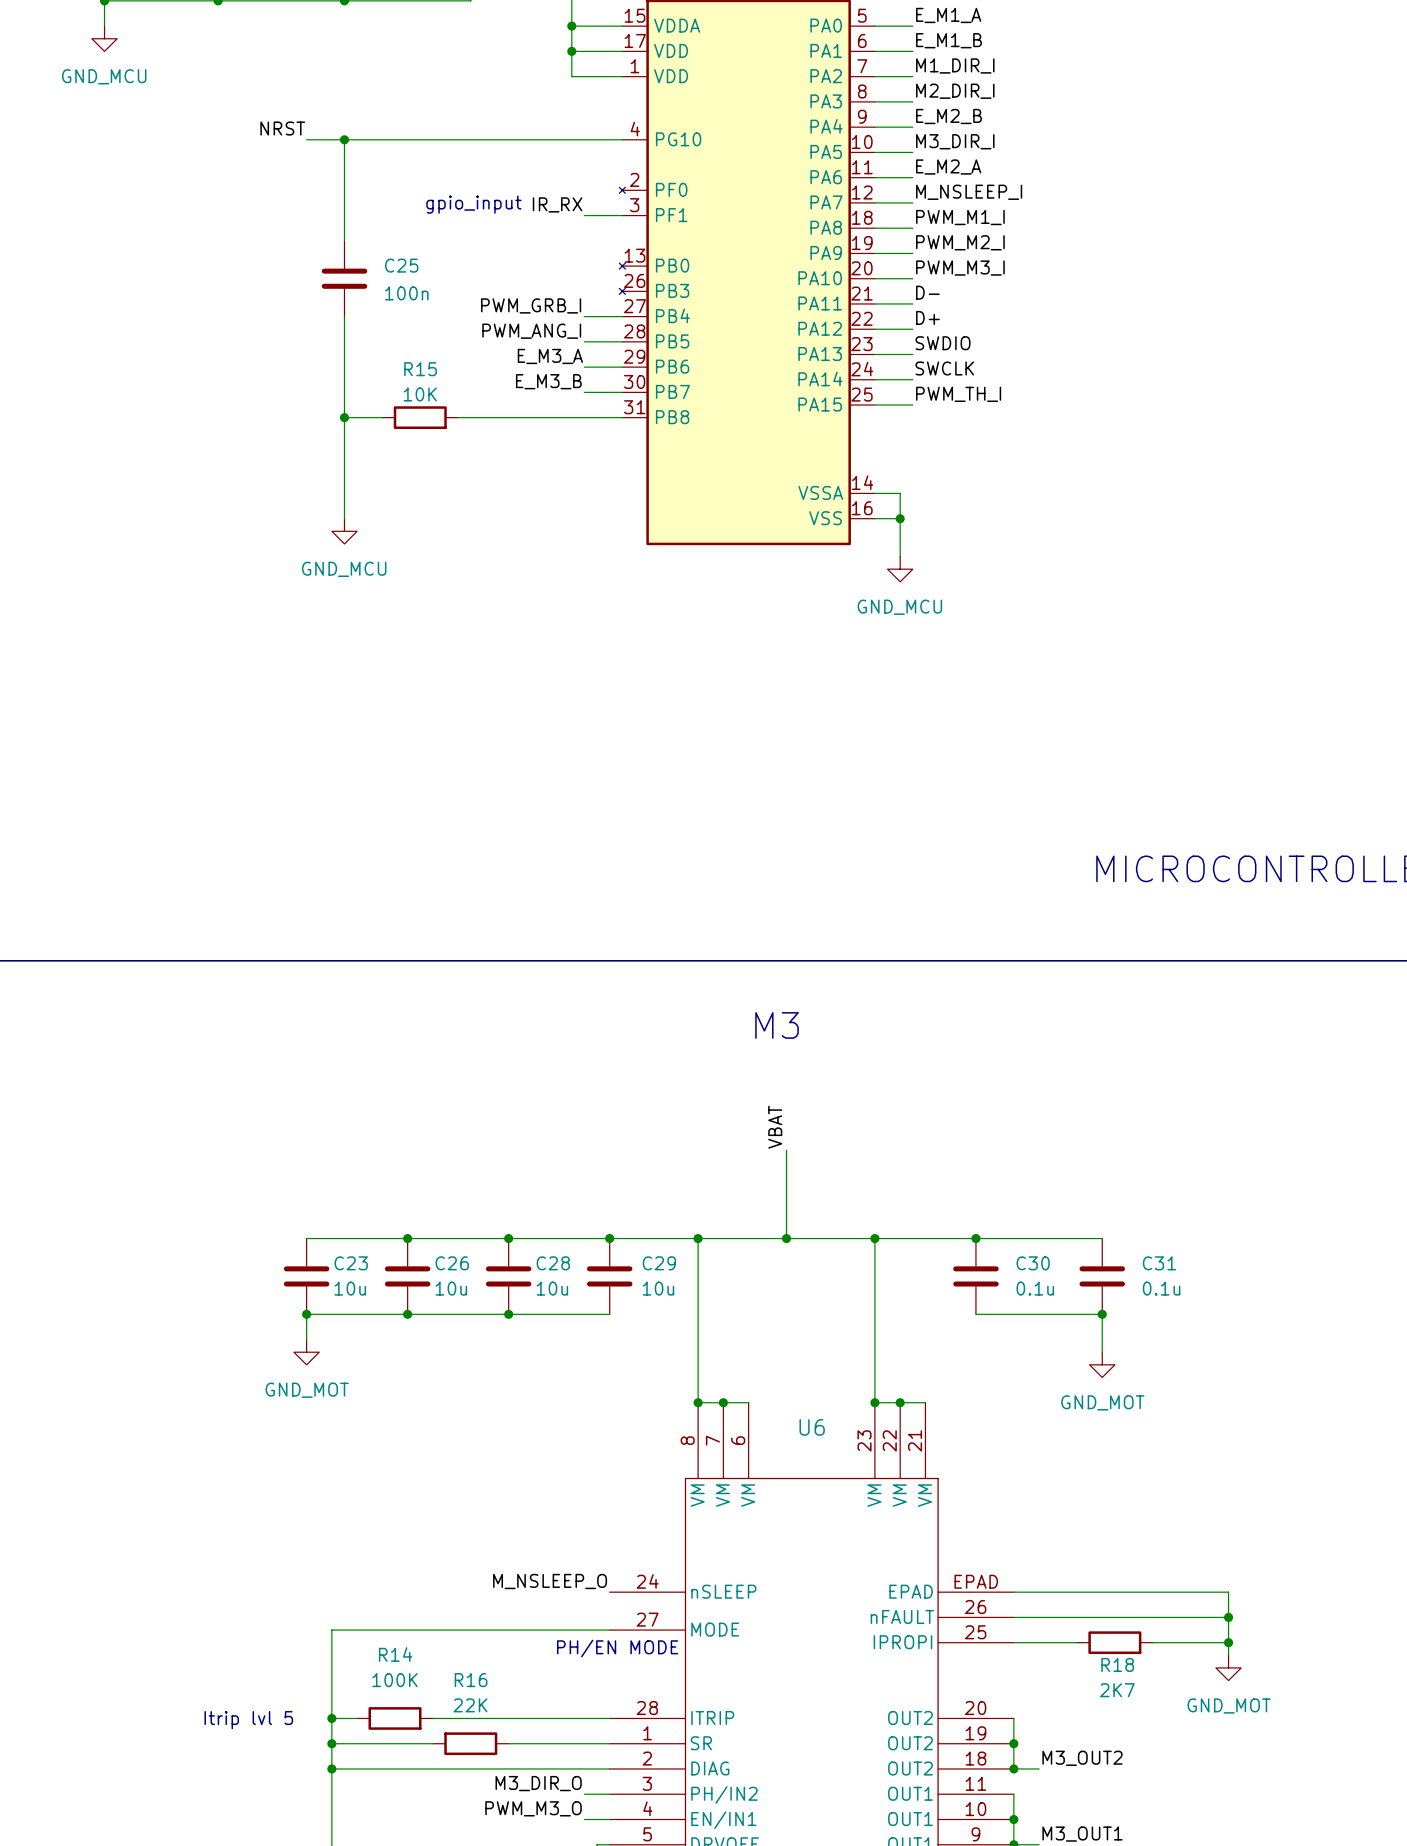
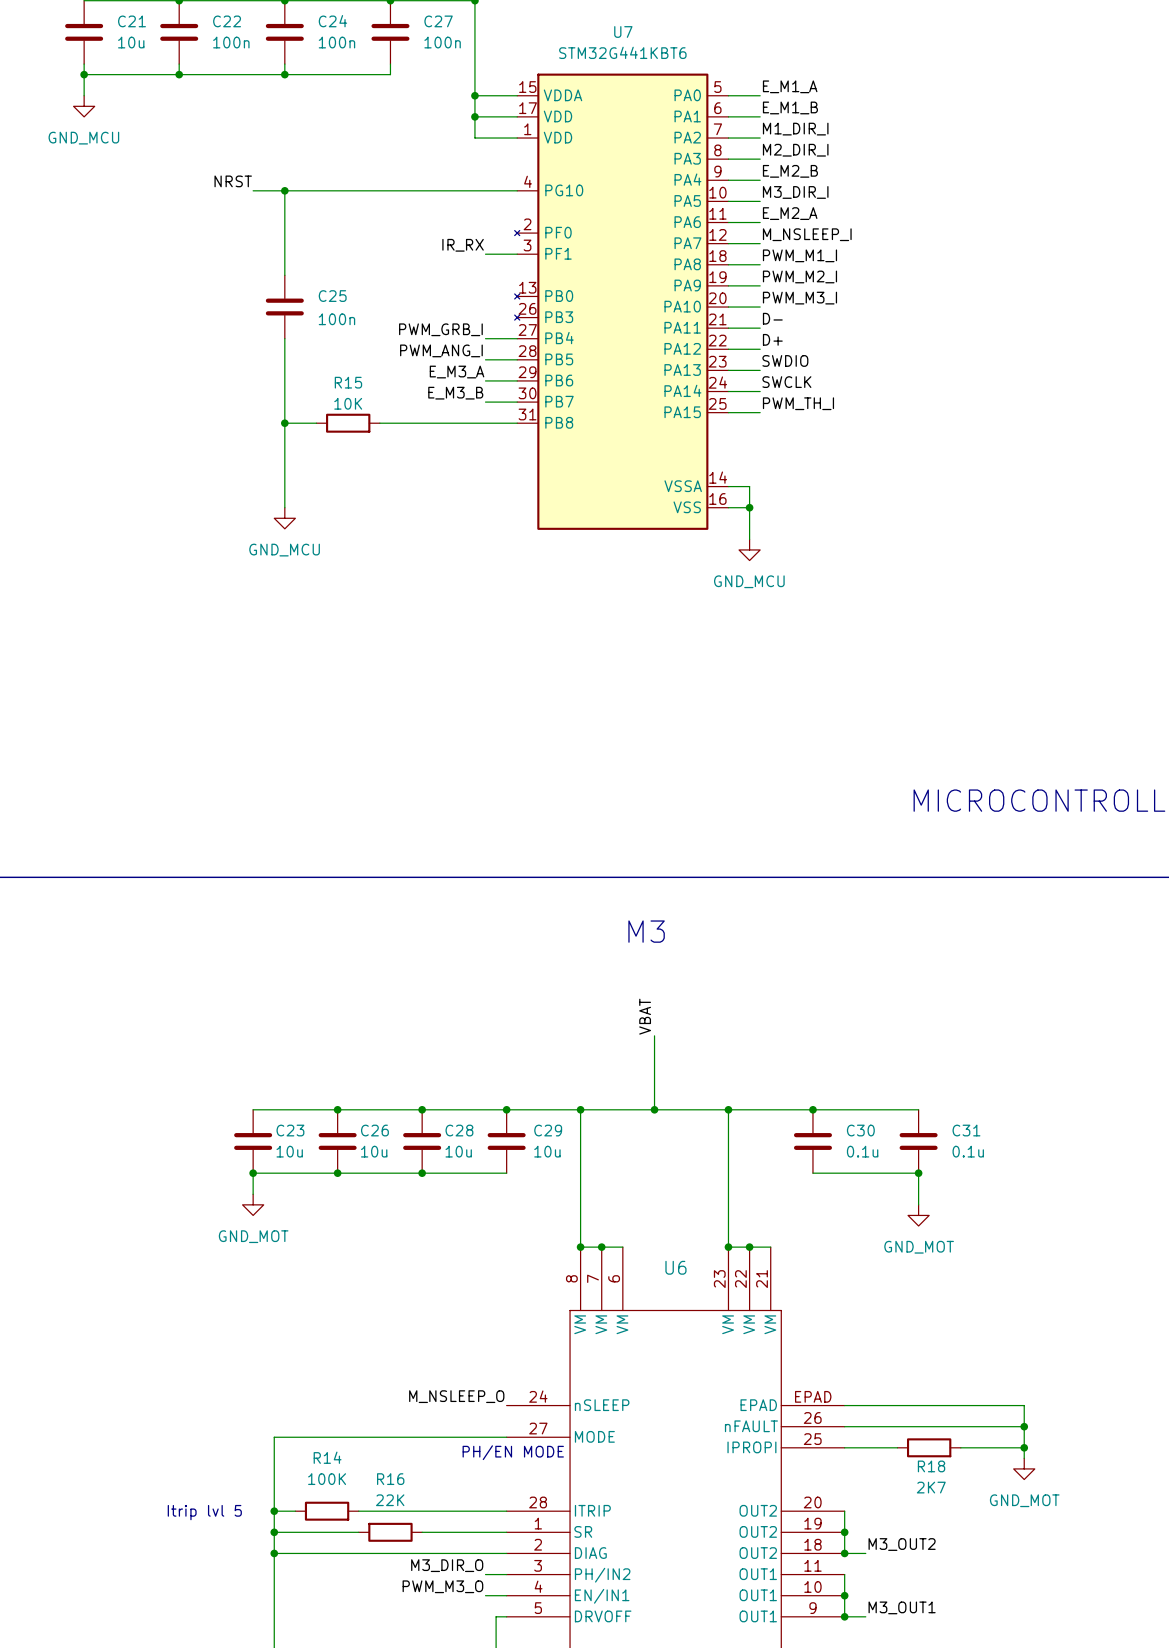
text: gpio_input (473, 204) -> none

